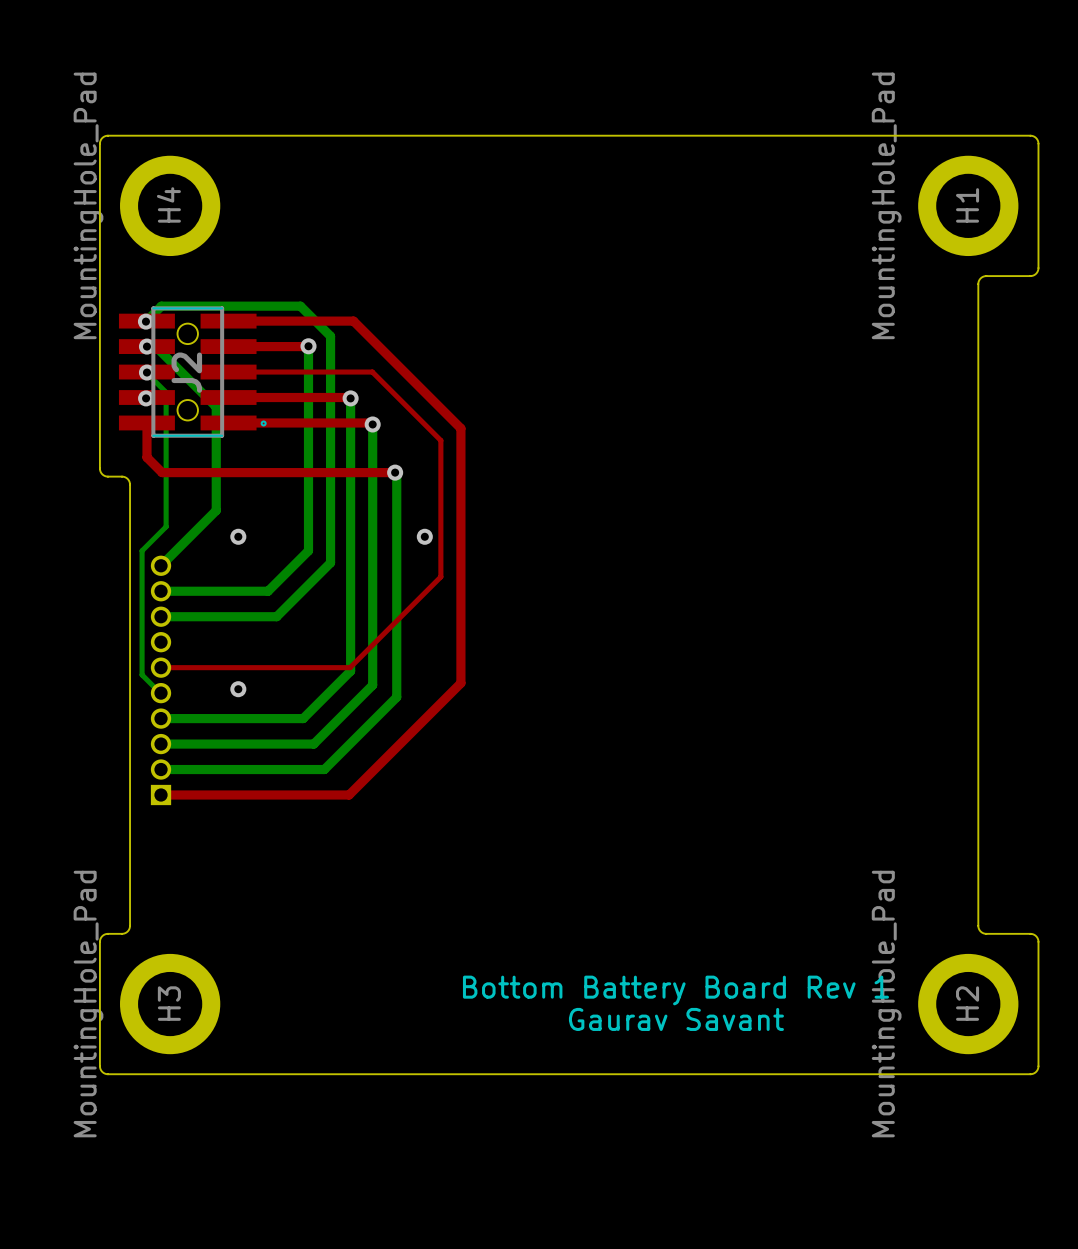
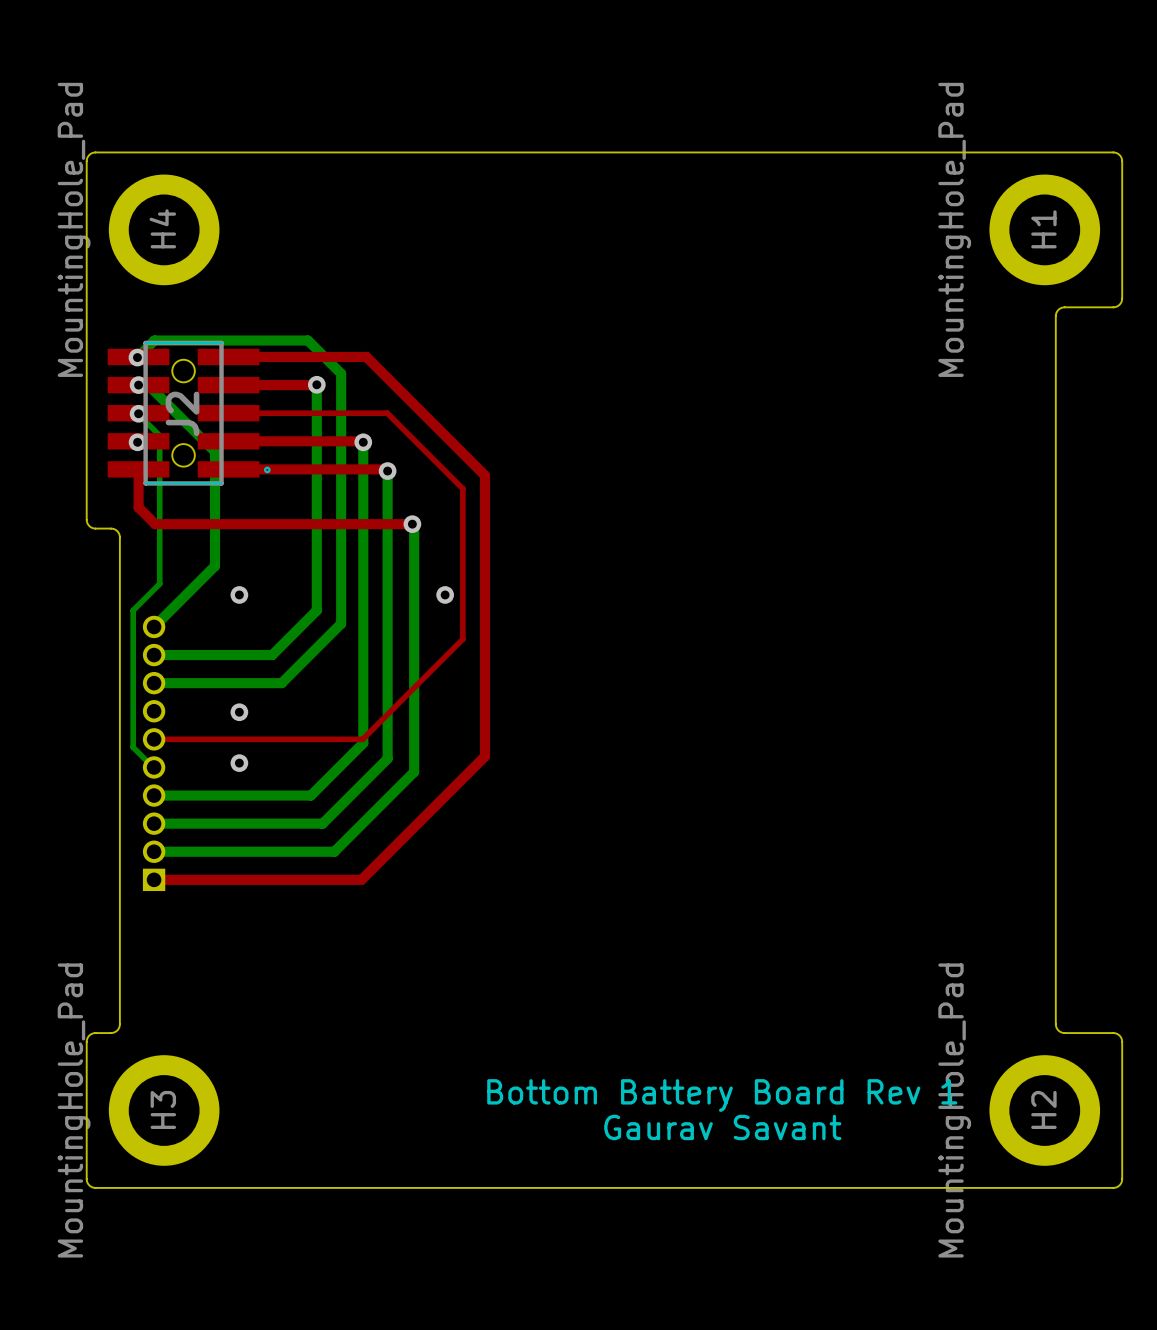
via: none -> (239, 712)

